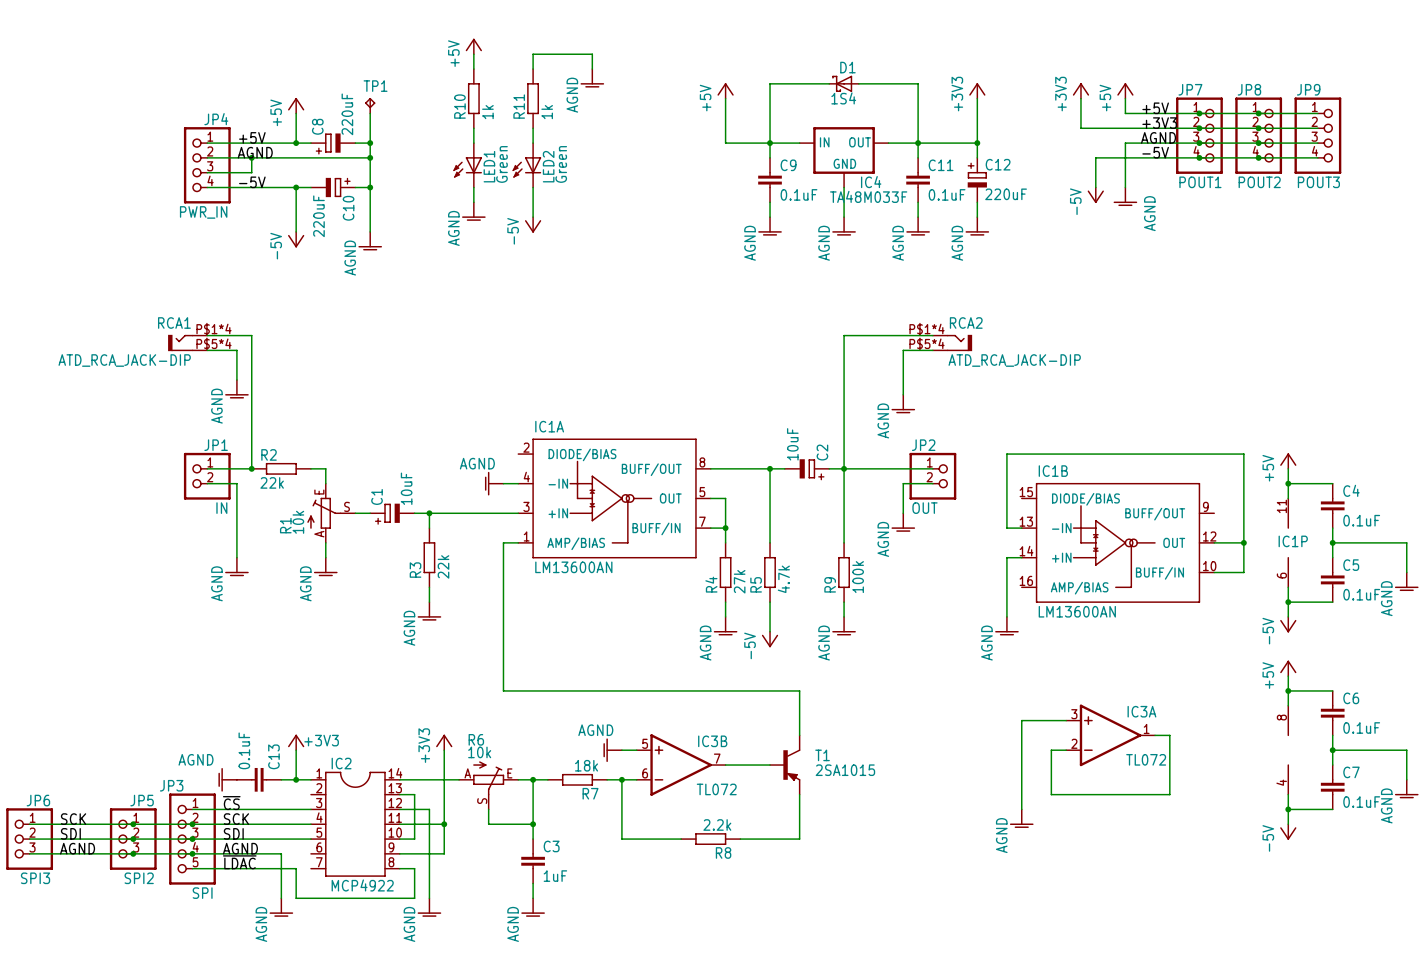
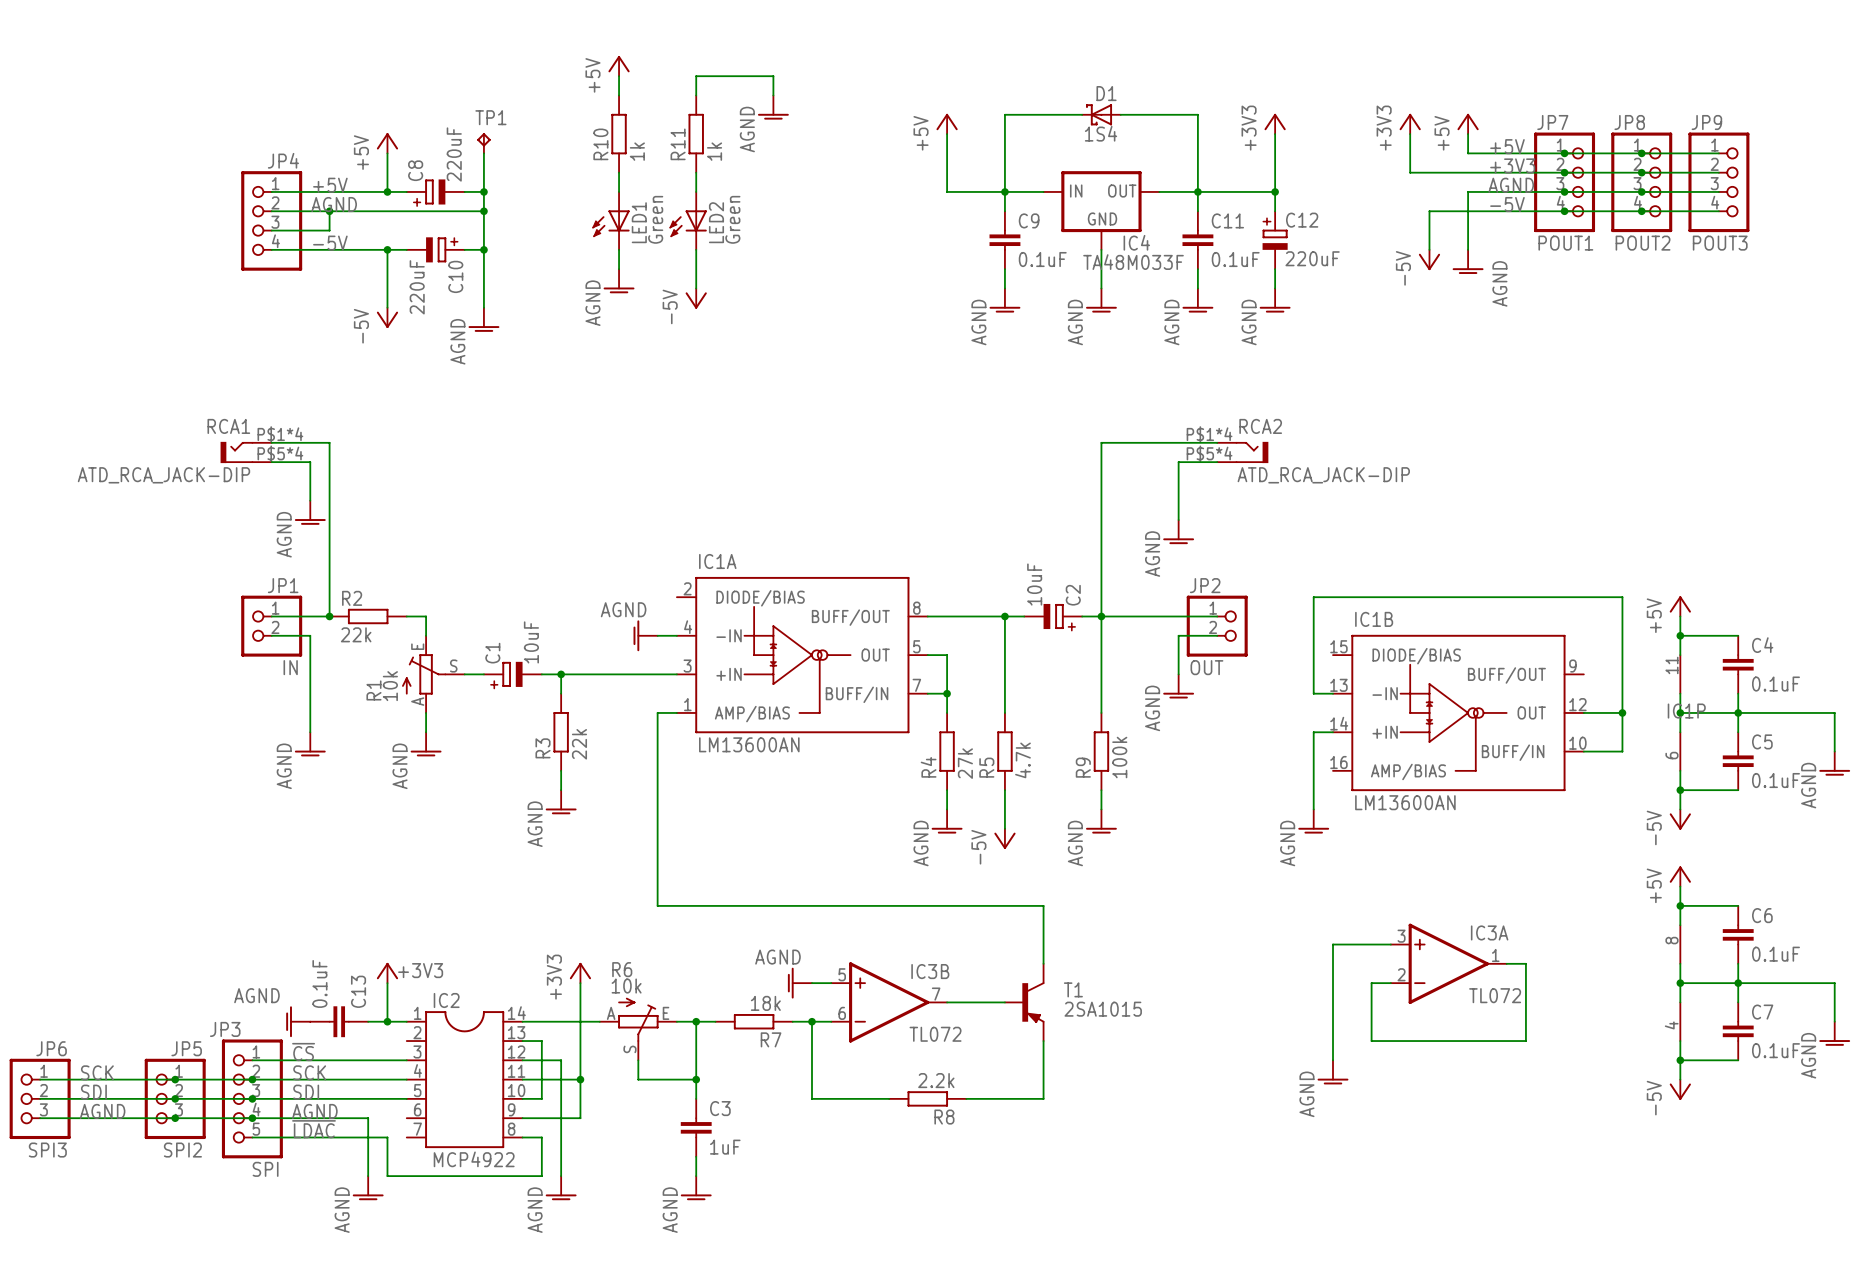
JP4 value: PWR_IN (203, 212) -> none
wire: none -> (1680, 693) (1680, 732)
wire: none -> (1680, 712) (1738, 712)
junction: none -> (1680, 712)
wire: none -> (1680, 963) (1680, 1002)
wire: none -> (1680, 983) (1738, 983)
junction: none -> (1680, 983)

